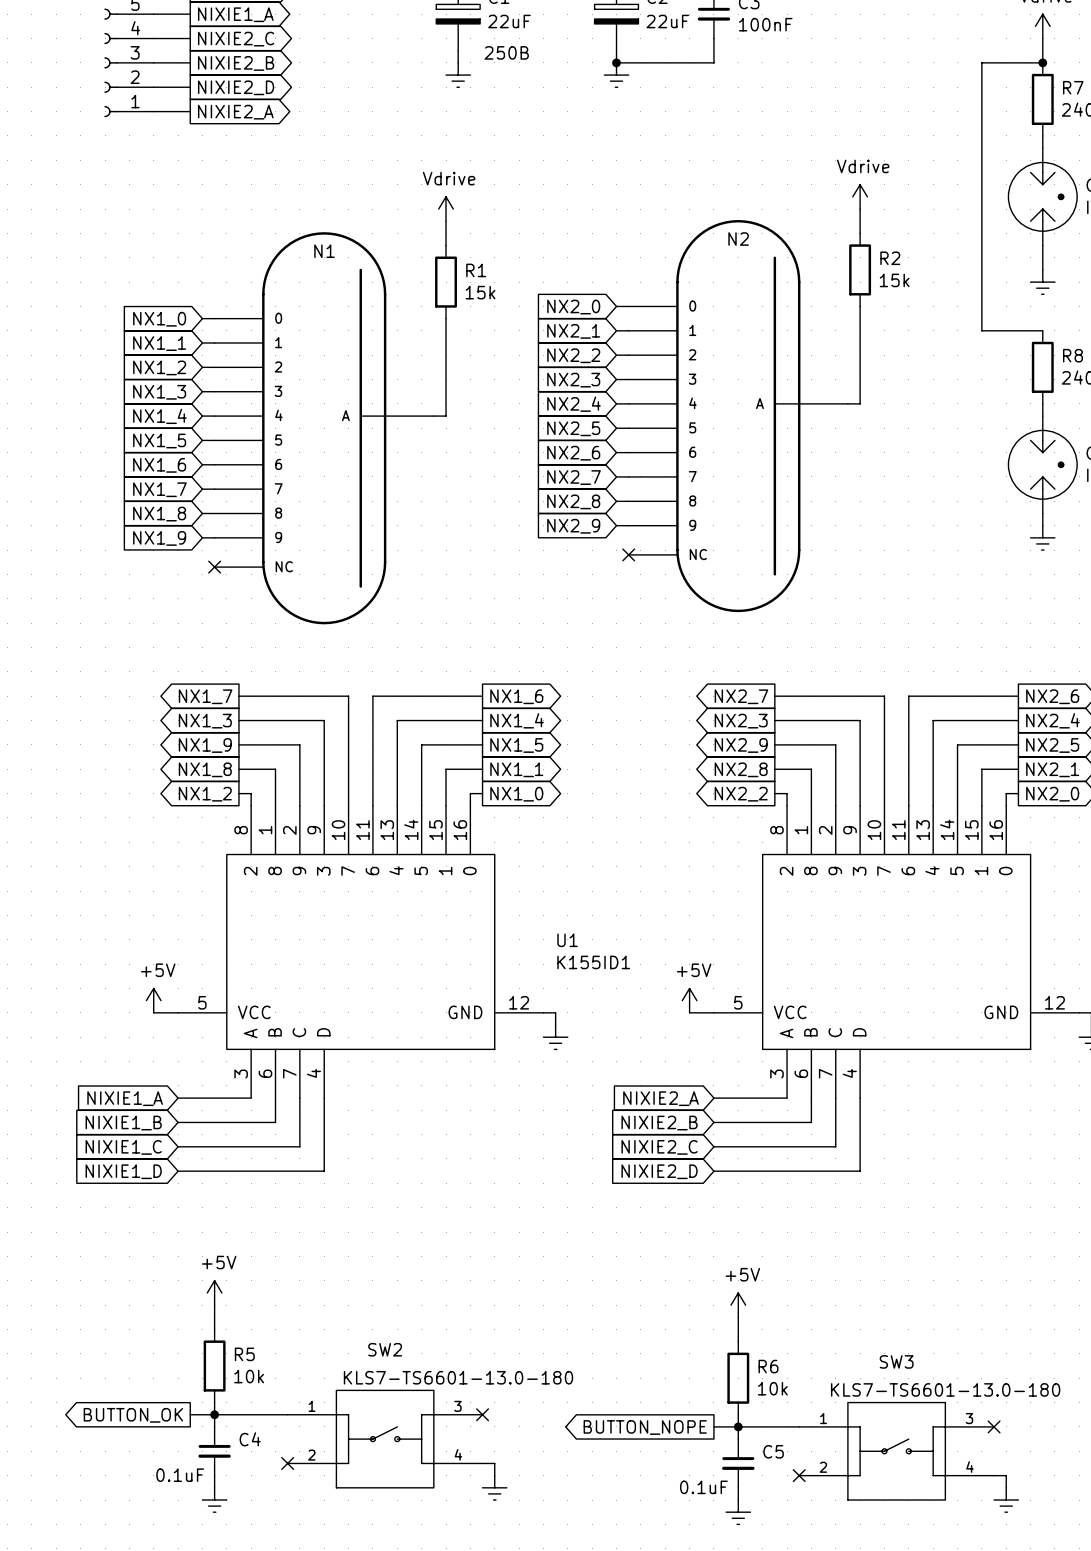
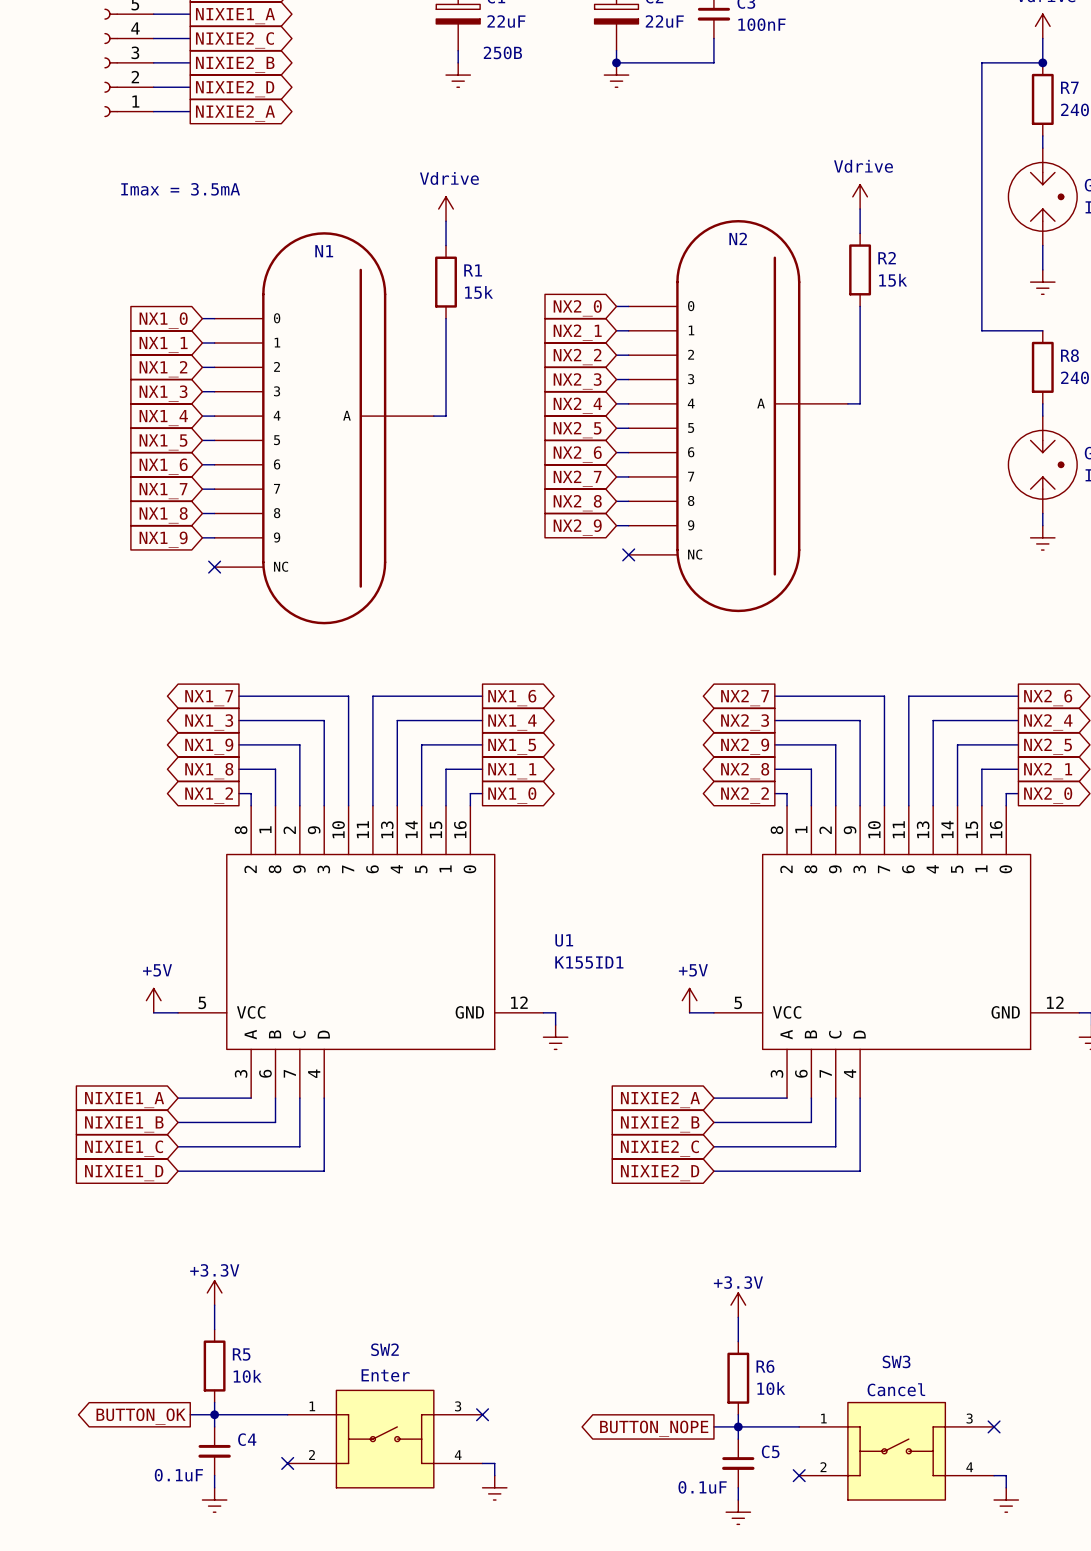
text: none -> Imax = 3.5mA (180, 189)
power symbol: +5V (214, 1292) -> +3.3V (214, 1292)
power symbol: +5V (738, 1305) -> +3.3V (738, 1305)
SW2 value: KLS7-TS6601-13.0-180 (458, 1377) -> Enter (385, 1375)
SW3 value: KLS7-TS6601-13.0-180 (945, 1389) -> Cancel (896, 1389)

